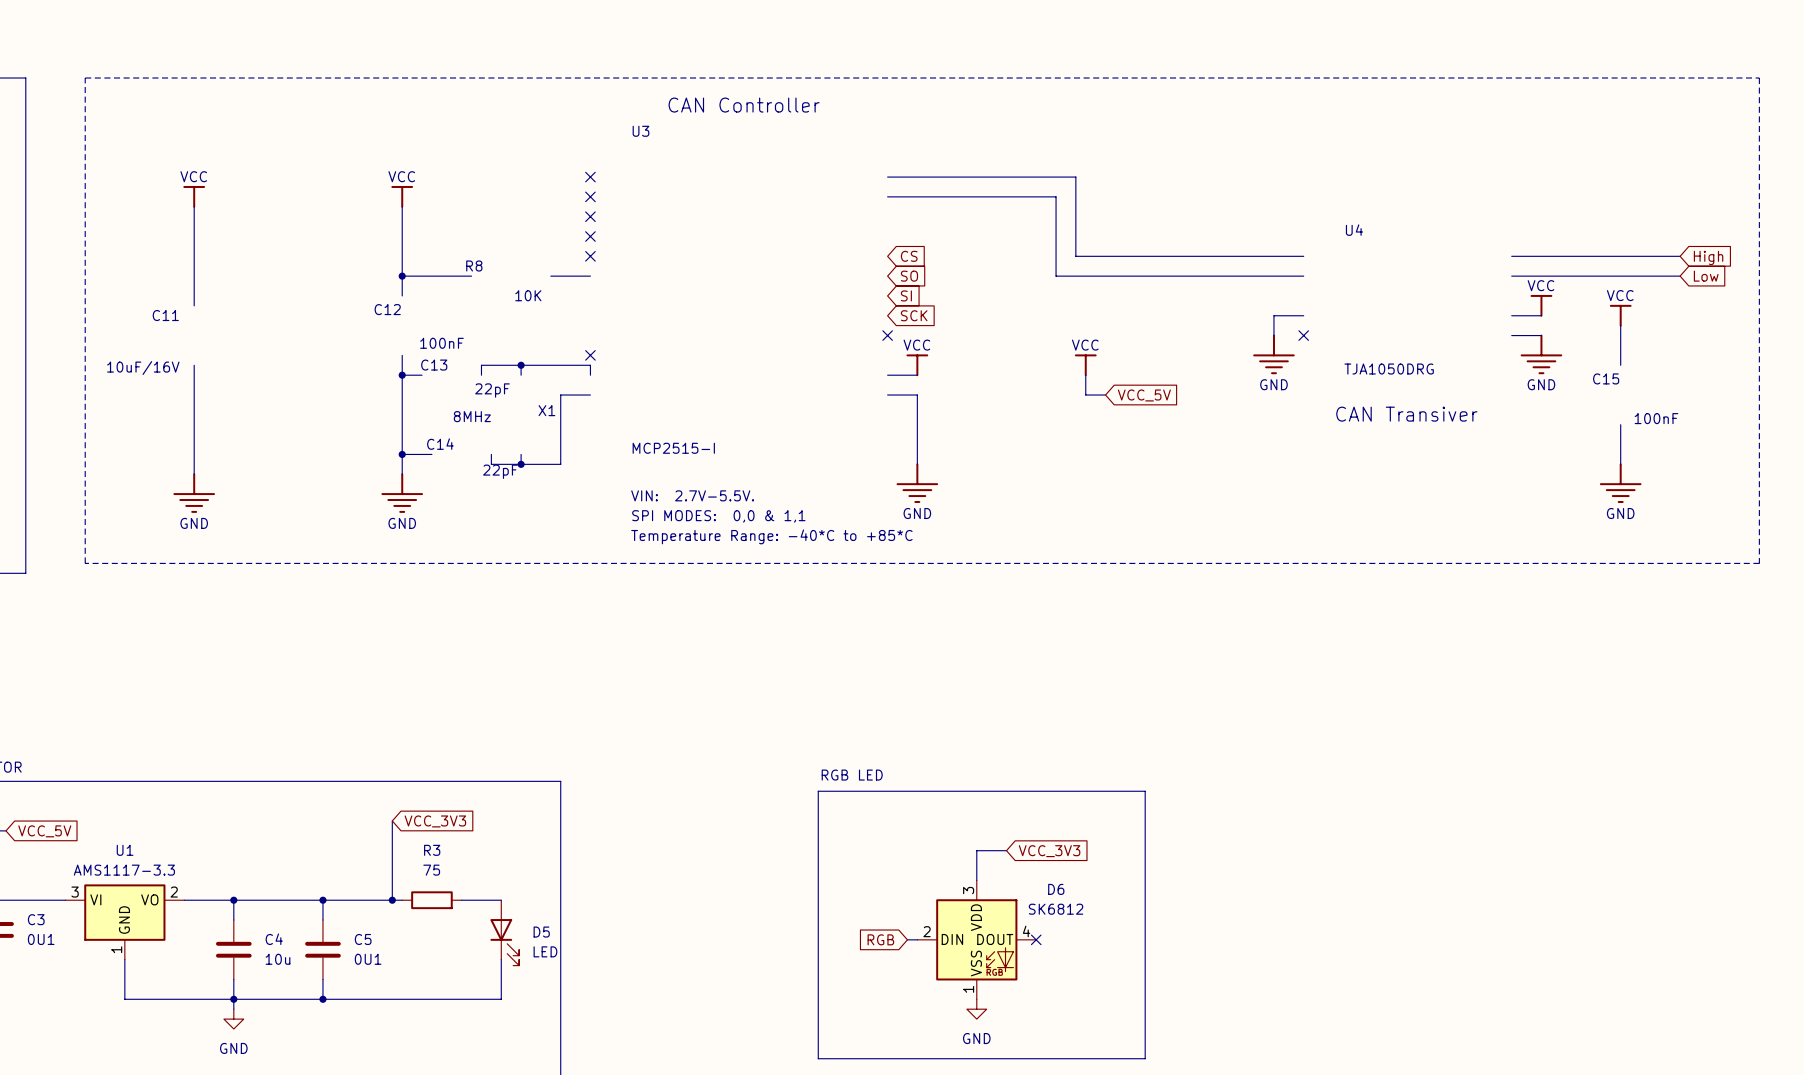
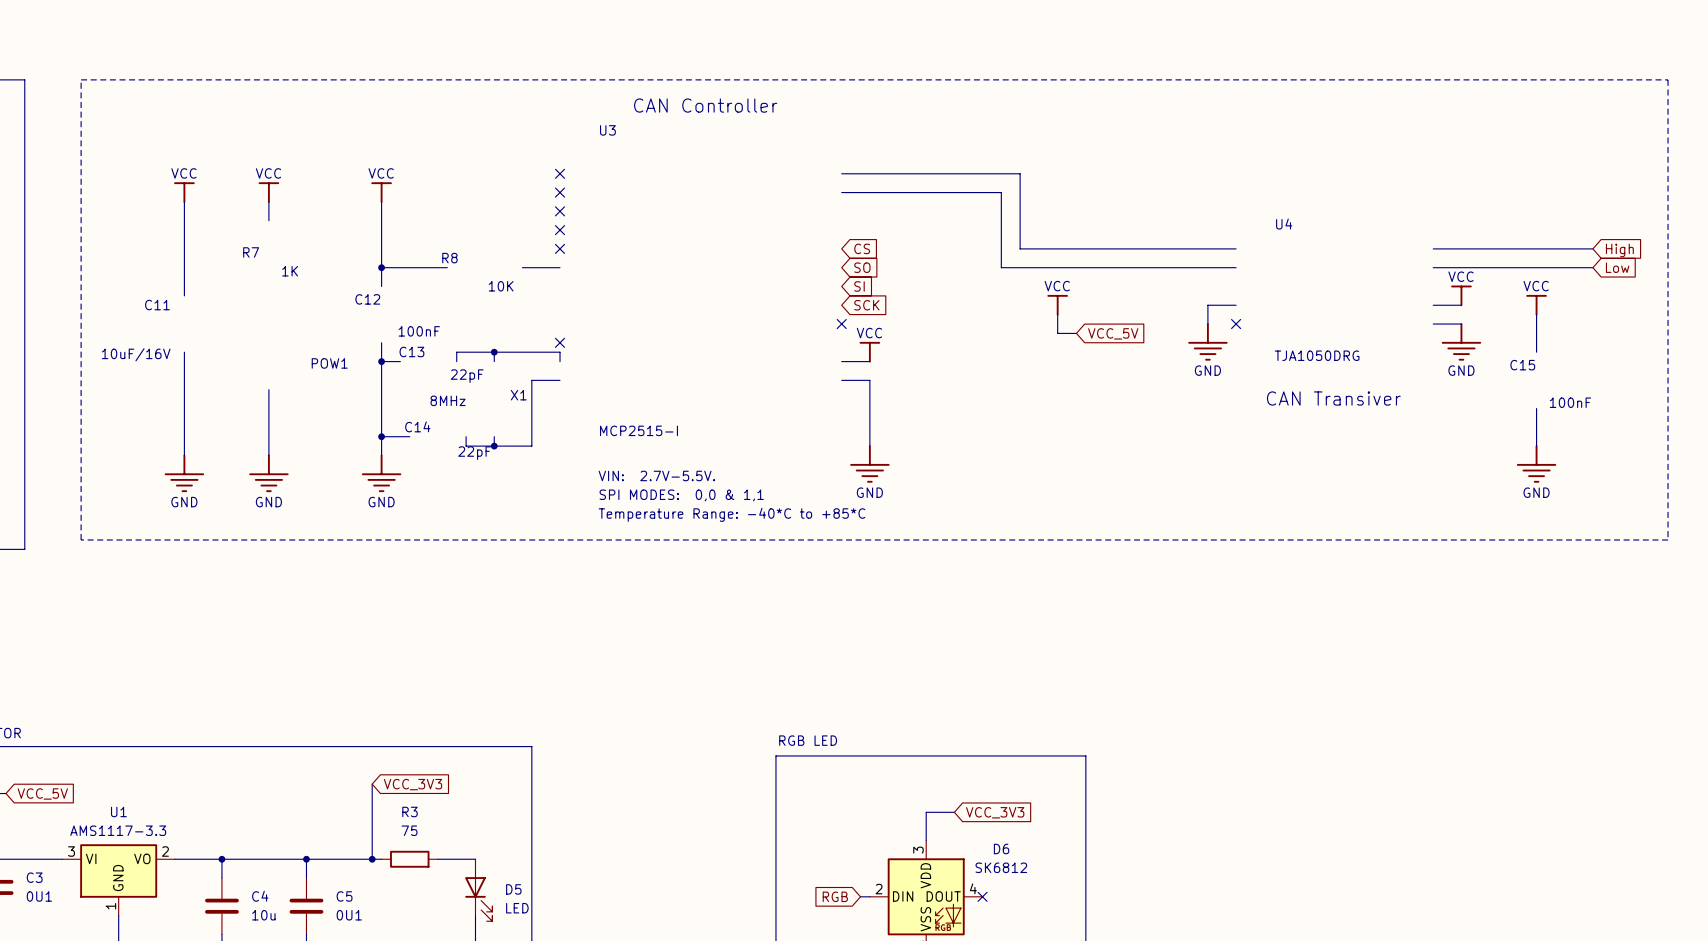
power symbol: none -> VCC (268, 192)
wire: none -> (268, 201) (268, 220)
R7: none -> (251, 252)
text: none -> 1K (290, 271)
power symbol position: VCC (1085, 365) -> VCC (1057, 305)
wire: (1085, 375) (1085, 395) (1105, 395) -> (1057, 314) (1057, 333) (1076, 333)
POW1: none -> (329, 363)
global label position: VCC_5V (1144, 395) -> VCC_5V (1113, 333)
wire: none -> (268, 389) (268, 455)
power symbol: none -> GND (268, 473)

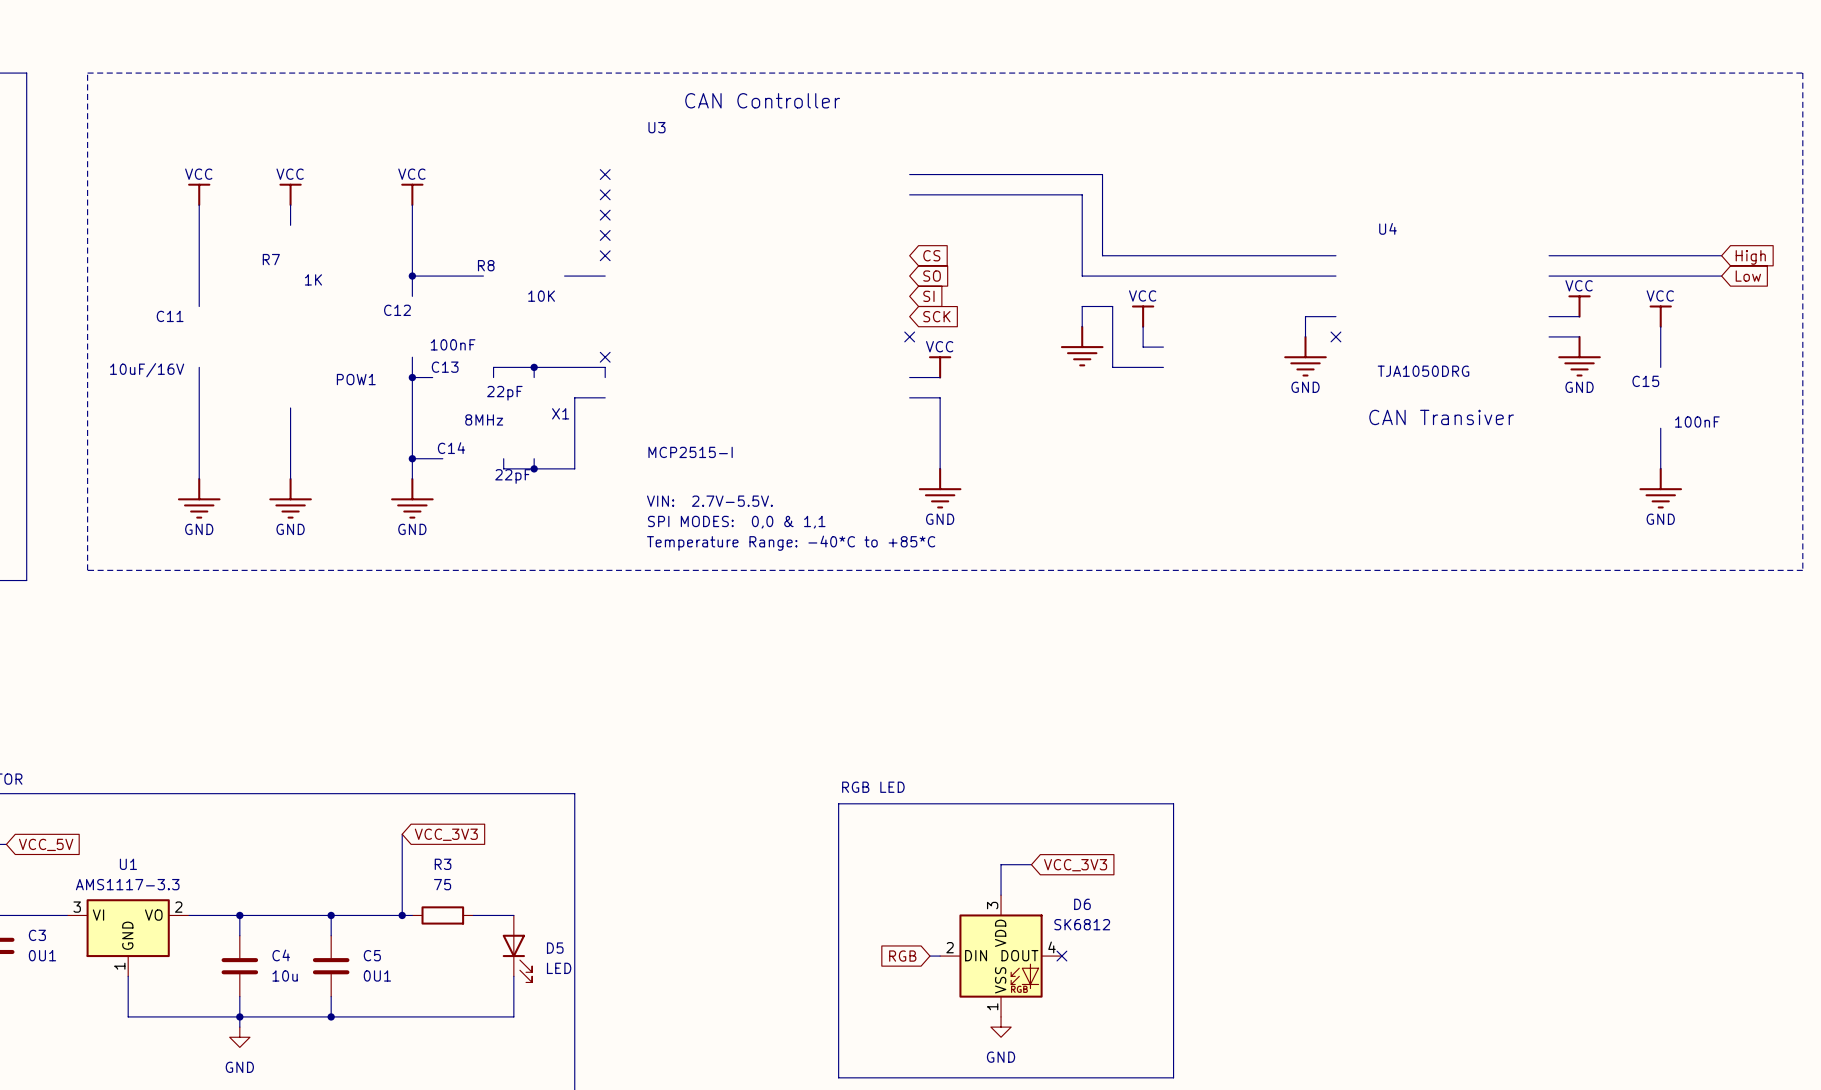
wire: none -> (1082, 326) (1082, 306) (1112, 306) (1112, 367) (1163, 367)
power symbol: none -> (1082, 346)
global label: VCC_5V (1113, 333) -> none

